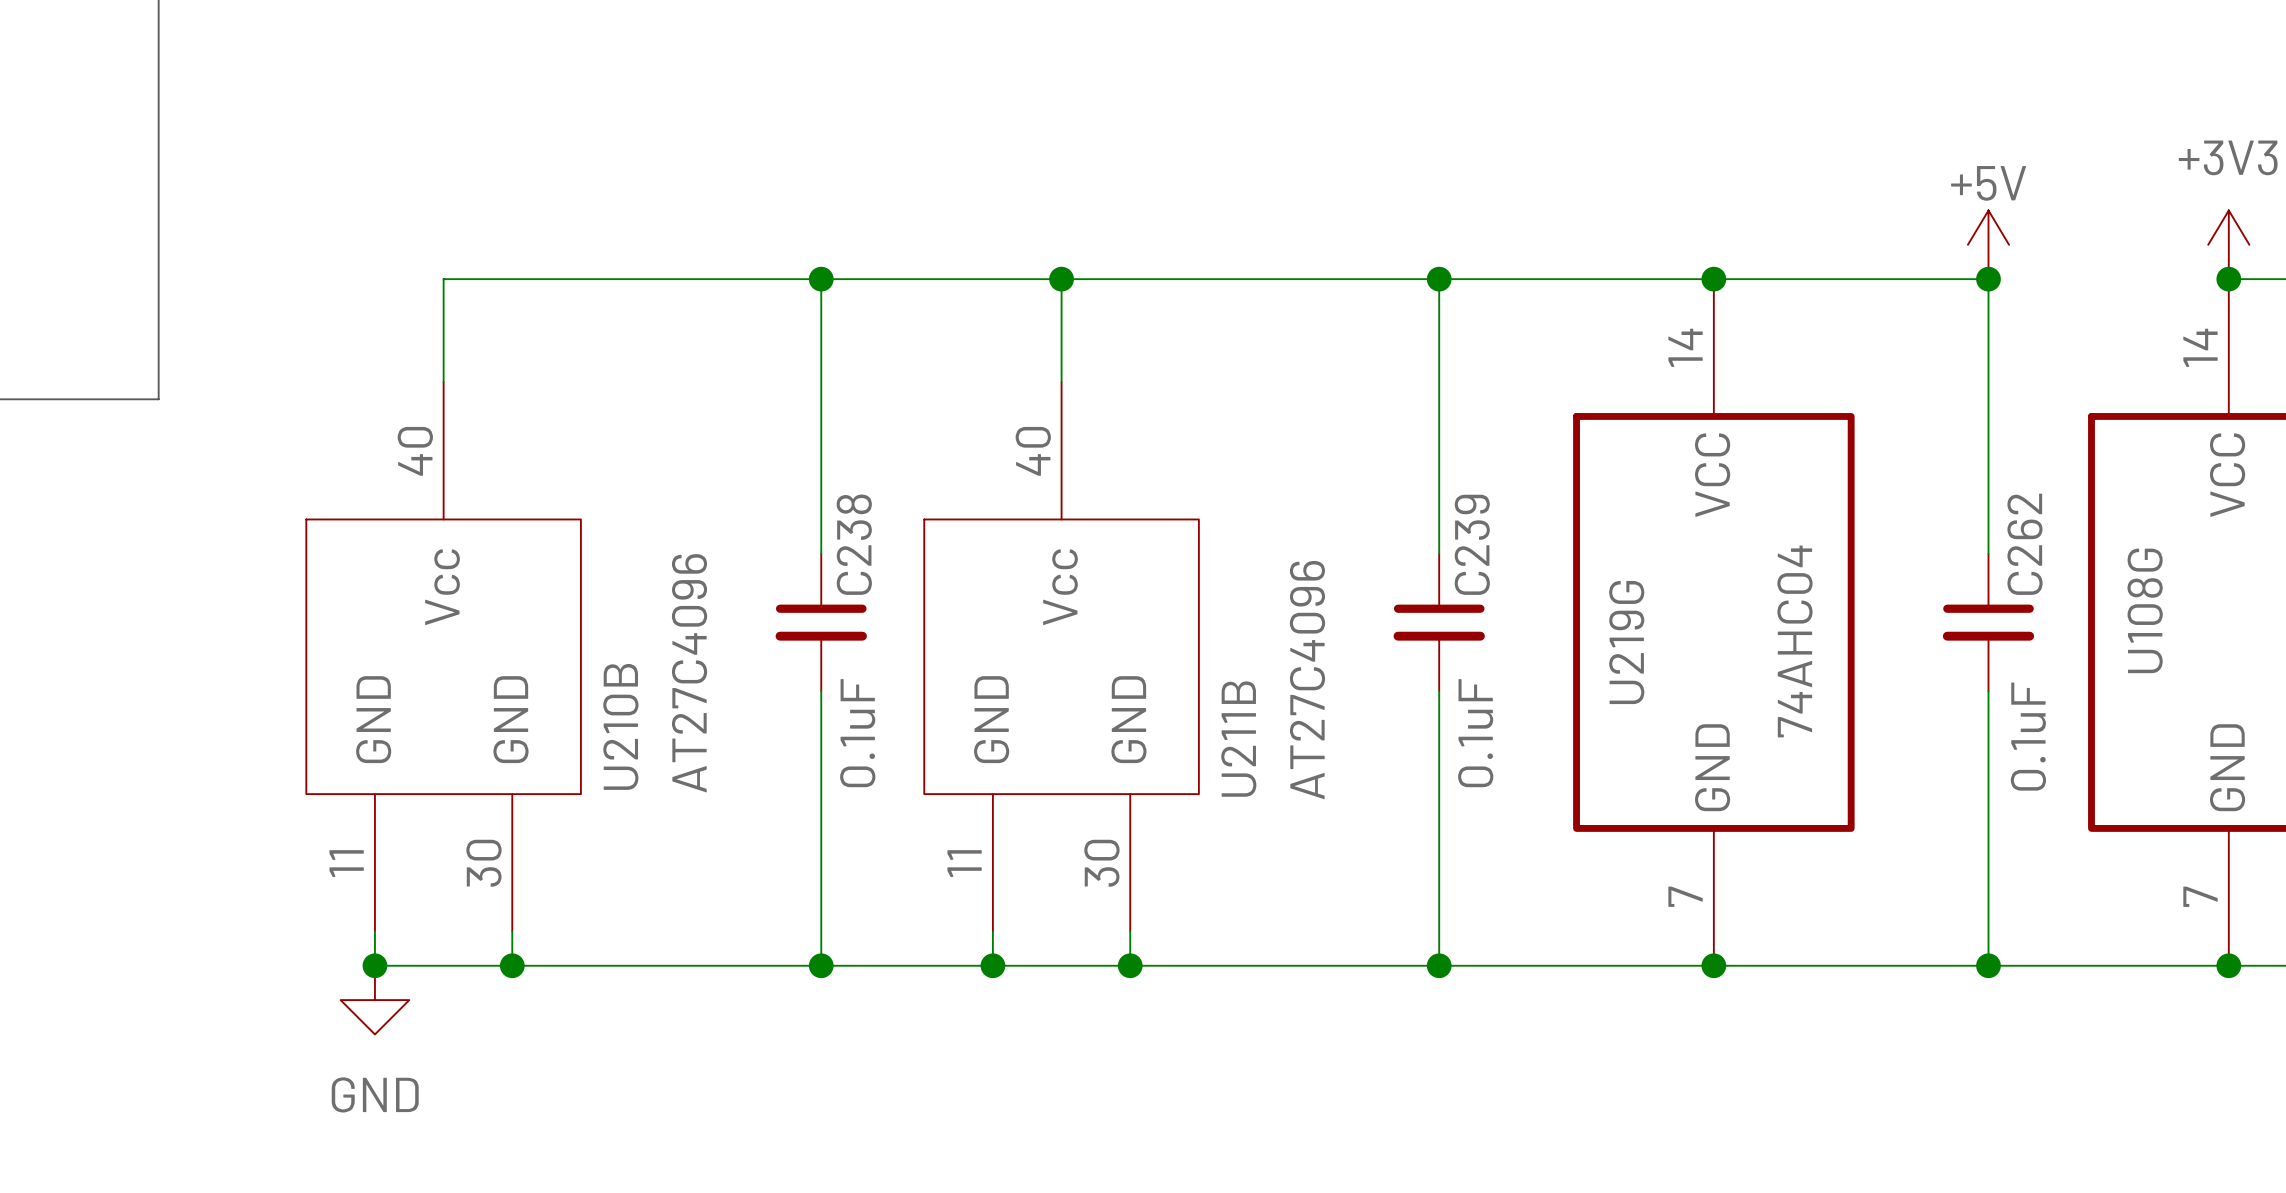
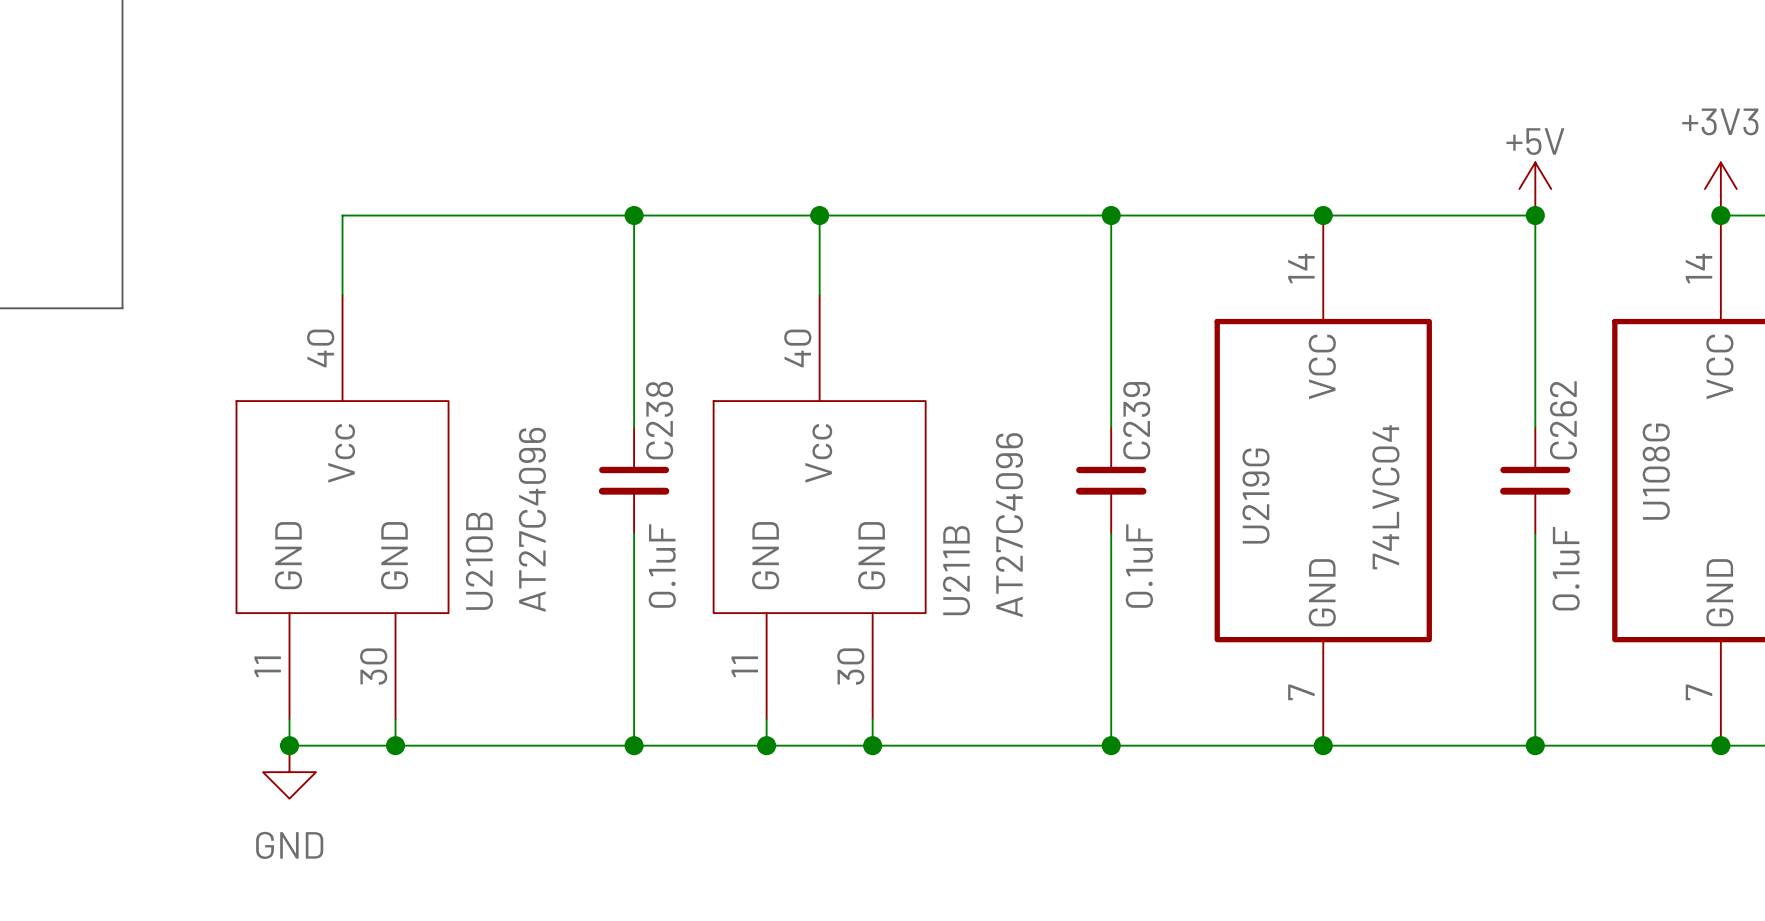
U219G value: 74AHC04 (1794, 641) -> 74LVC04 (1385, 497)

